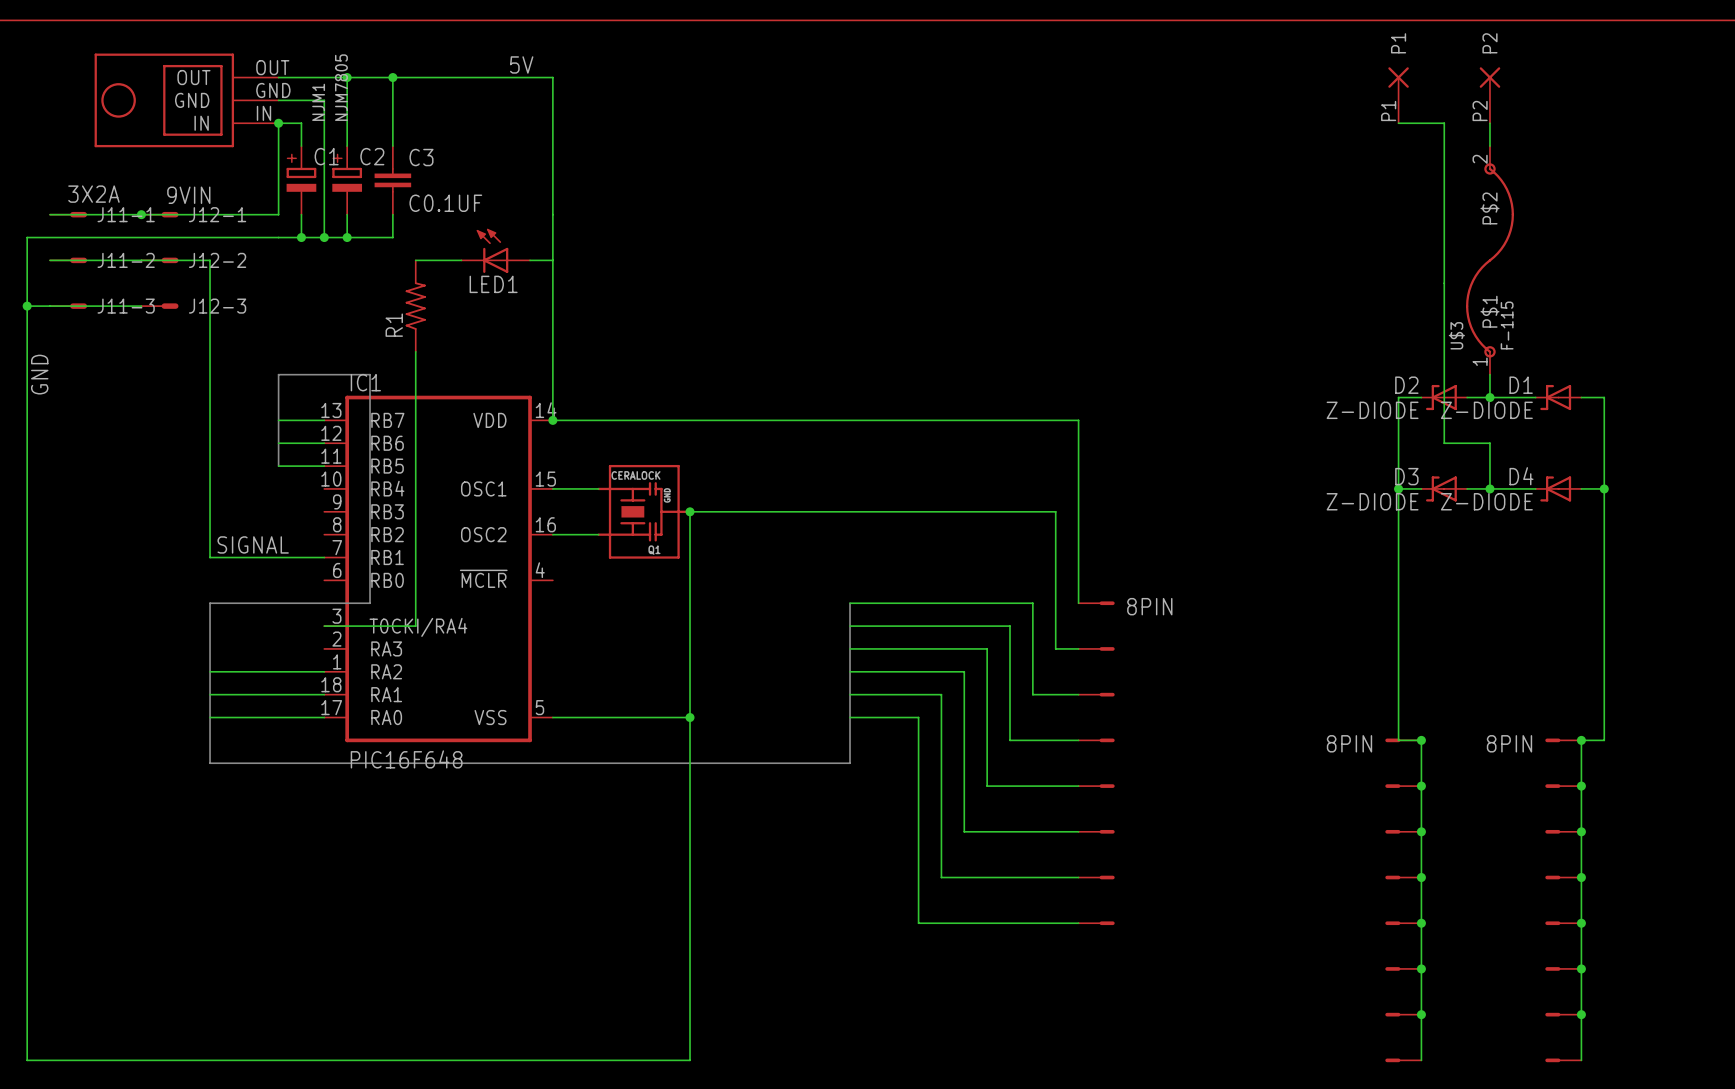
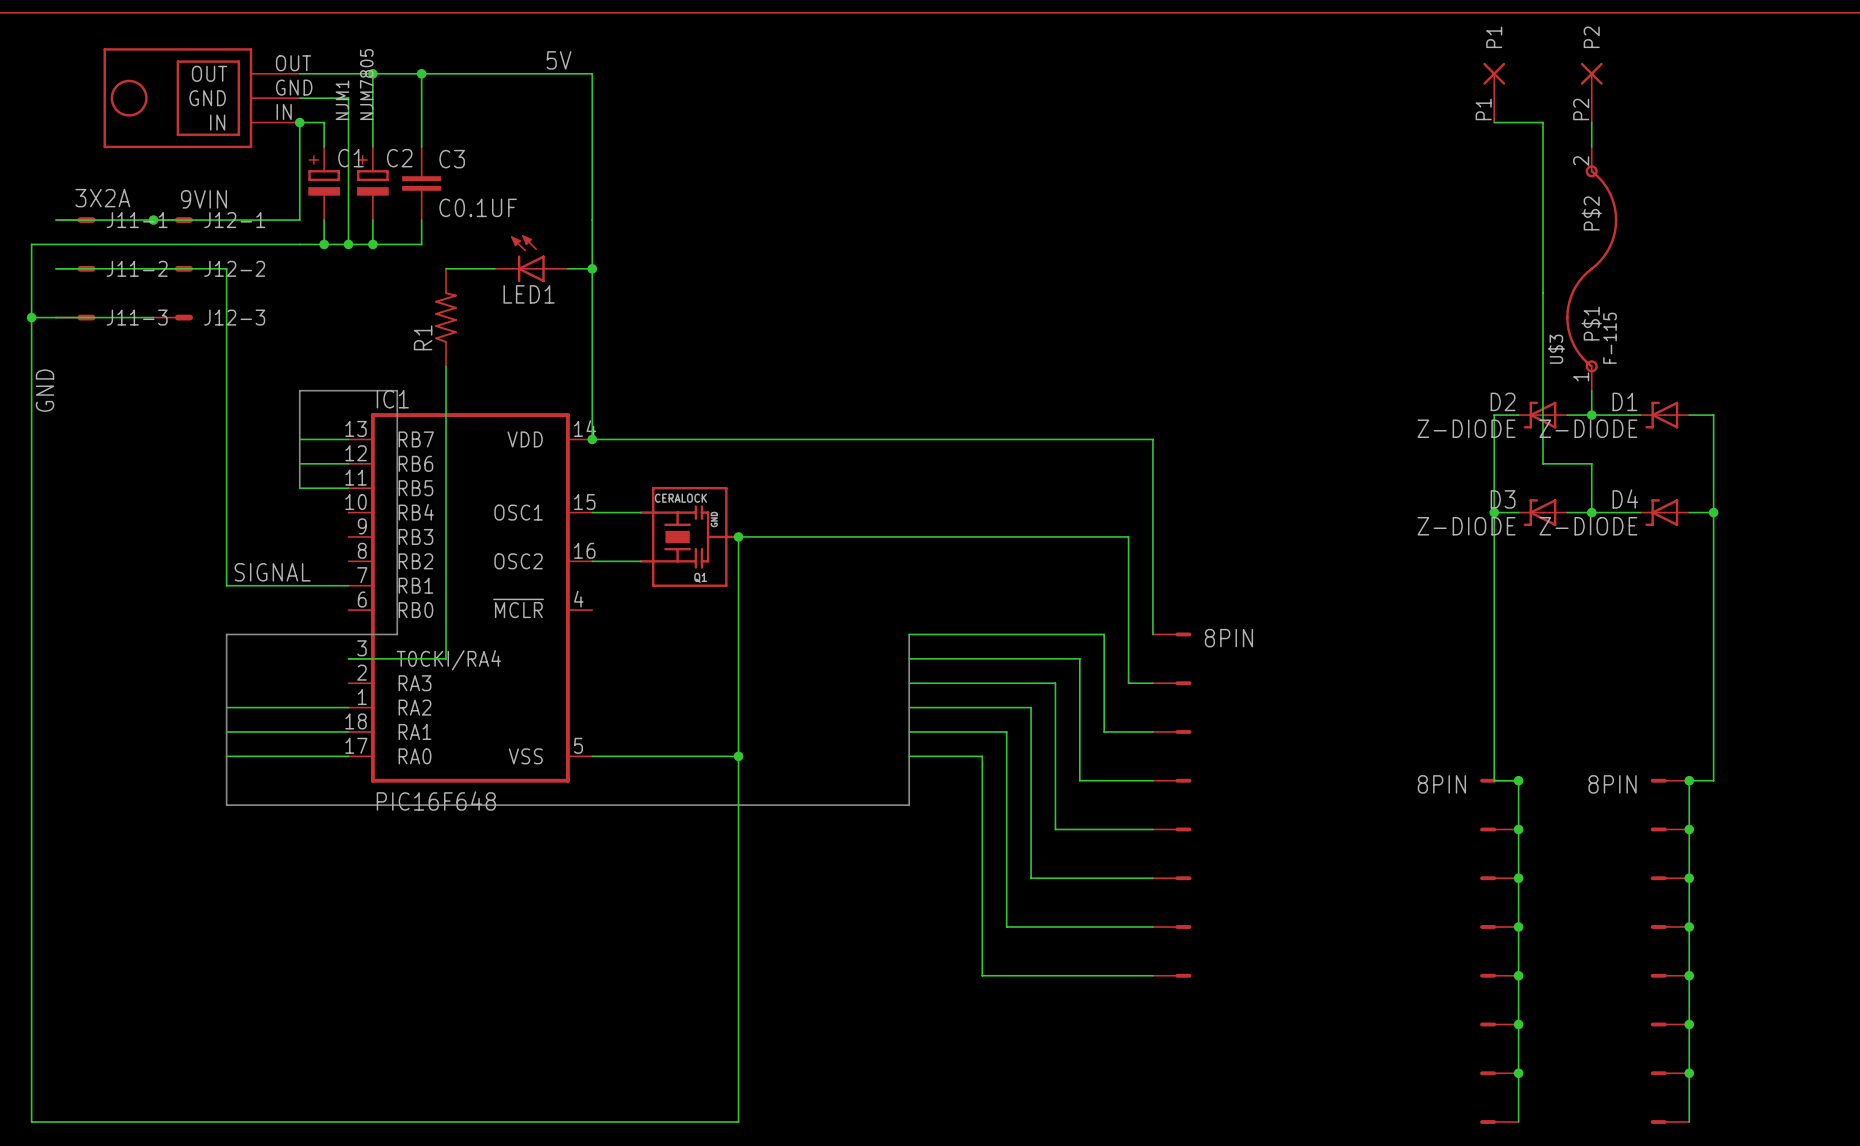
junction: none -> (592, 268)

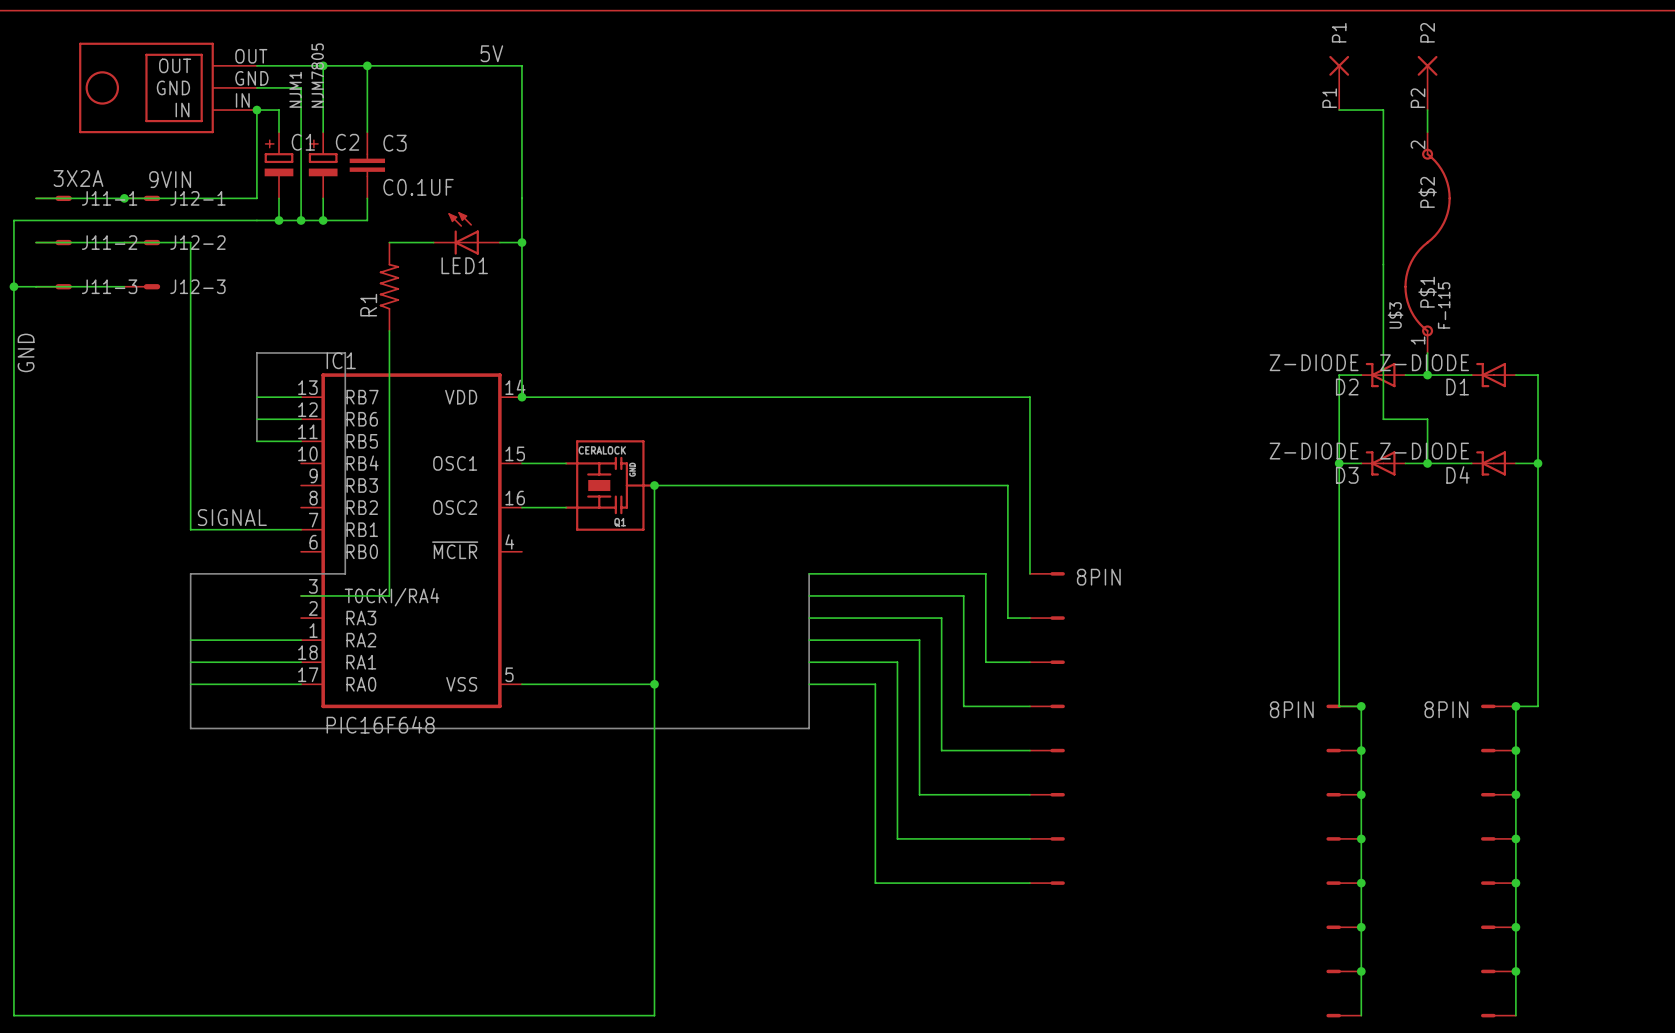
D2 flip: as is (1539, 415) -> up-down (1380, 375)
D1 flip: as is (1661, 415) -> up-down (1491, 375)
D3 flip: as is (1539, 512) -> up-down (1380, 463)
D4 flip: as is (1661, 512) -> up-down (1491, 463)

